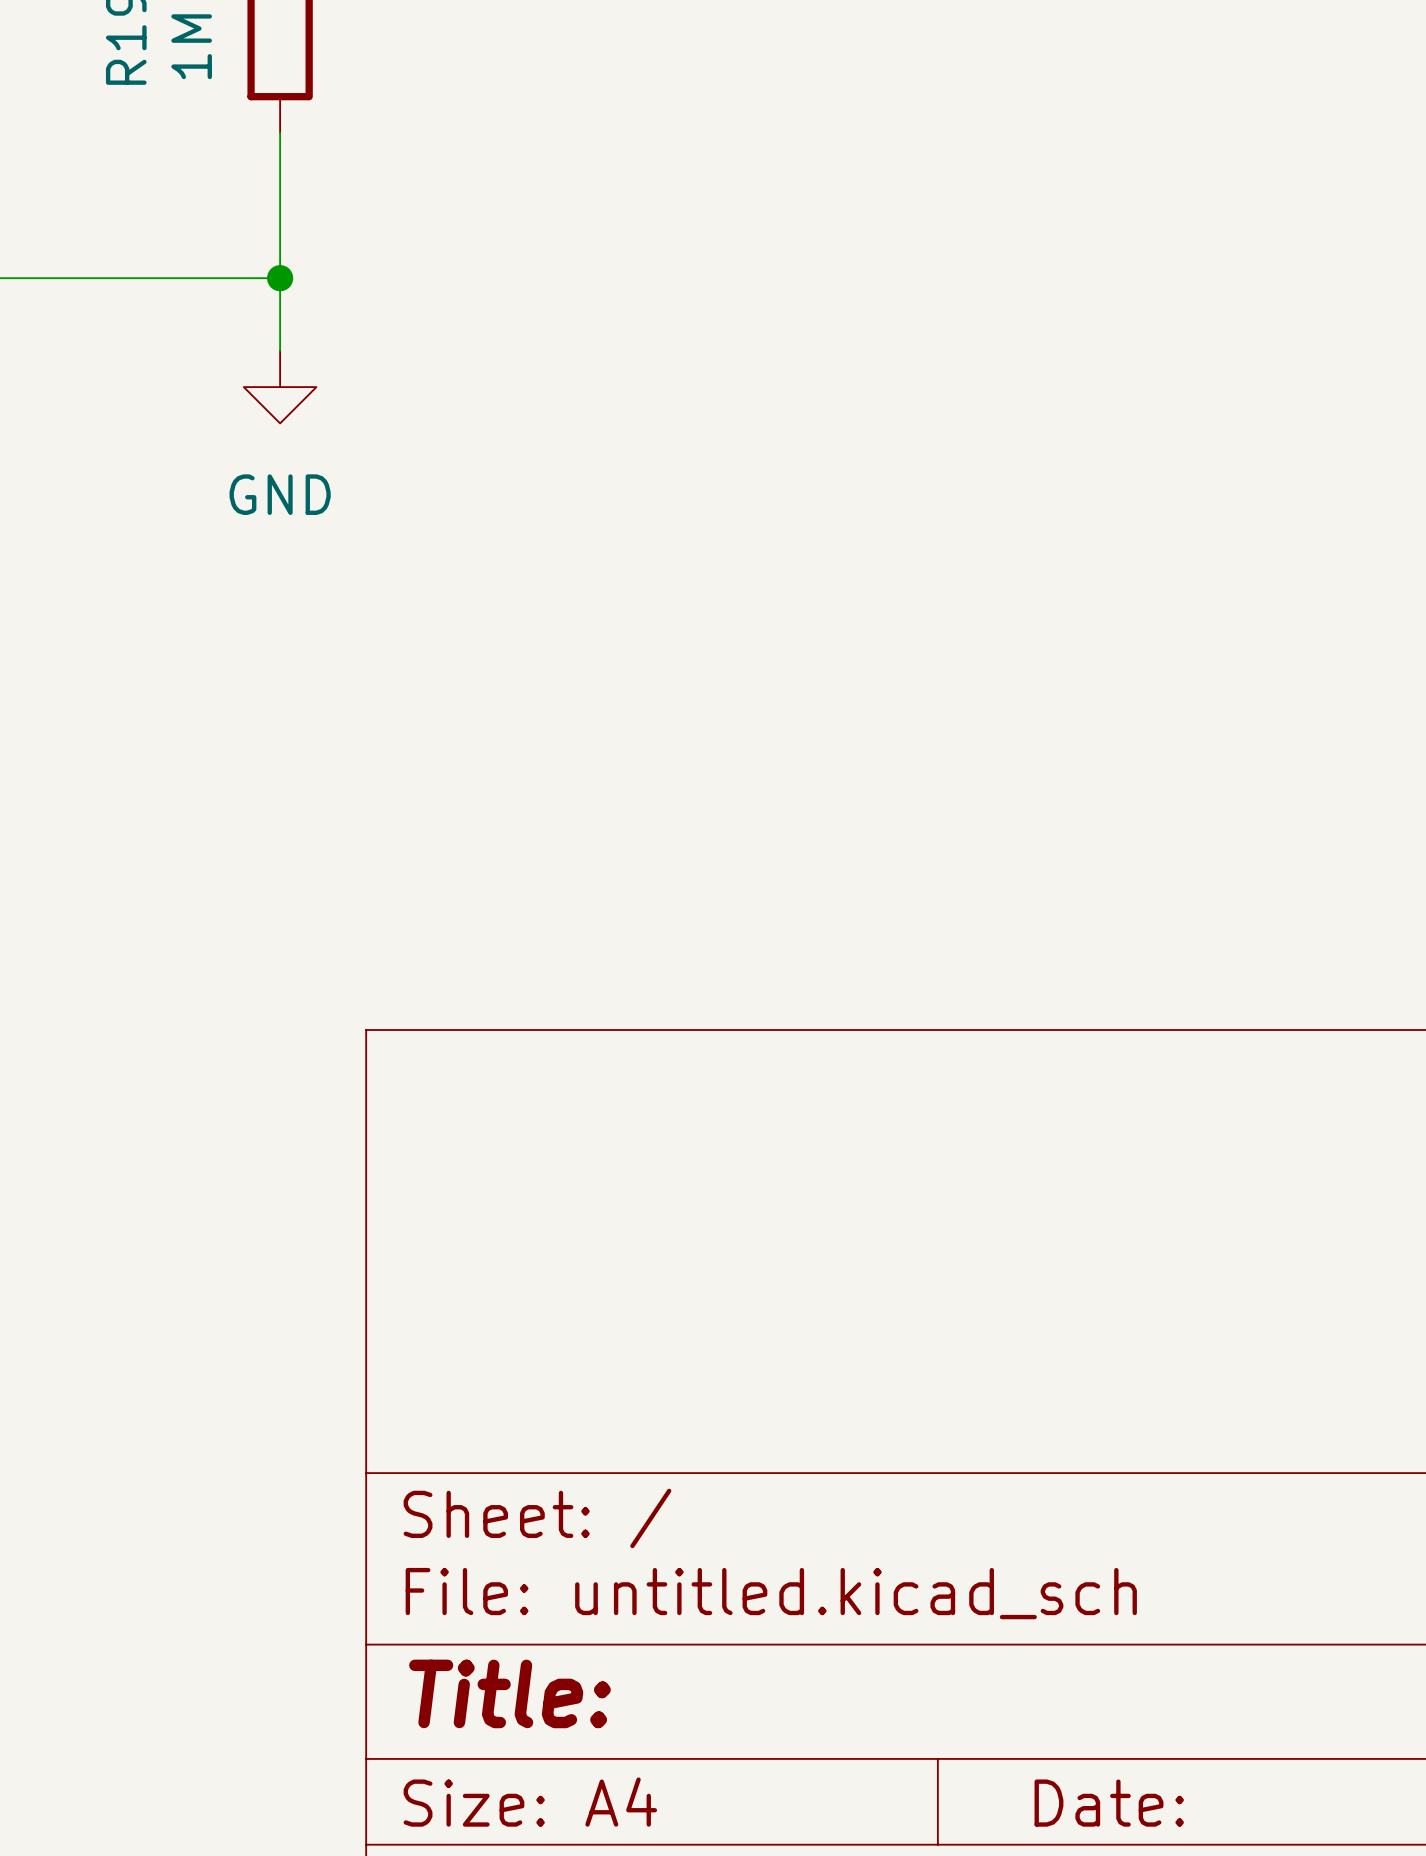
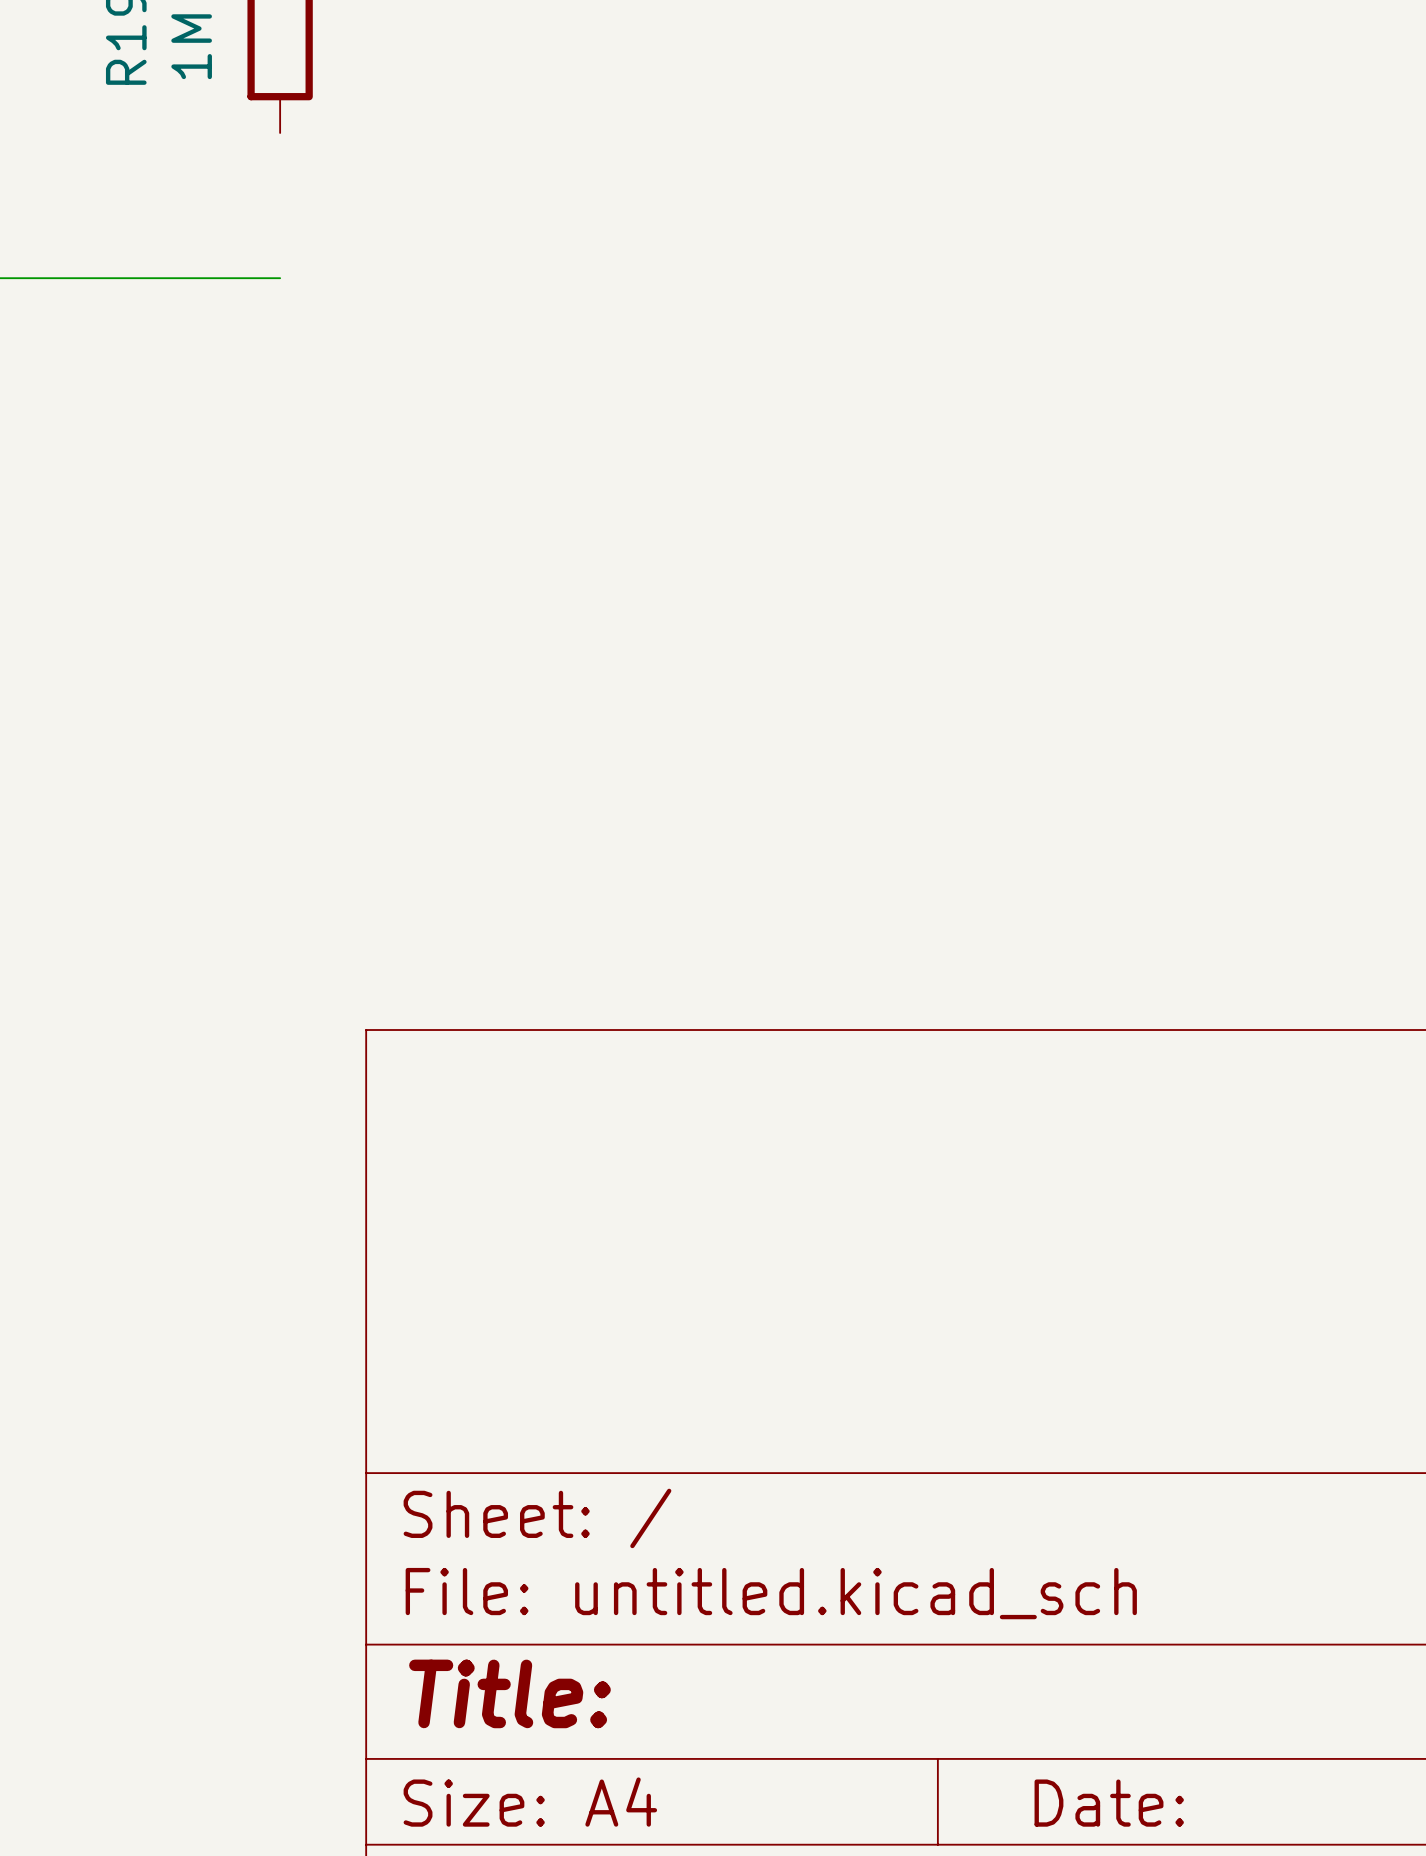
wire: (280, 132) (280, 350) -> none
junction: (280, 278) -> none
power symbol: GND (280, 387) -> none

